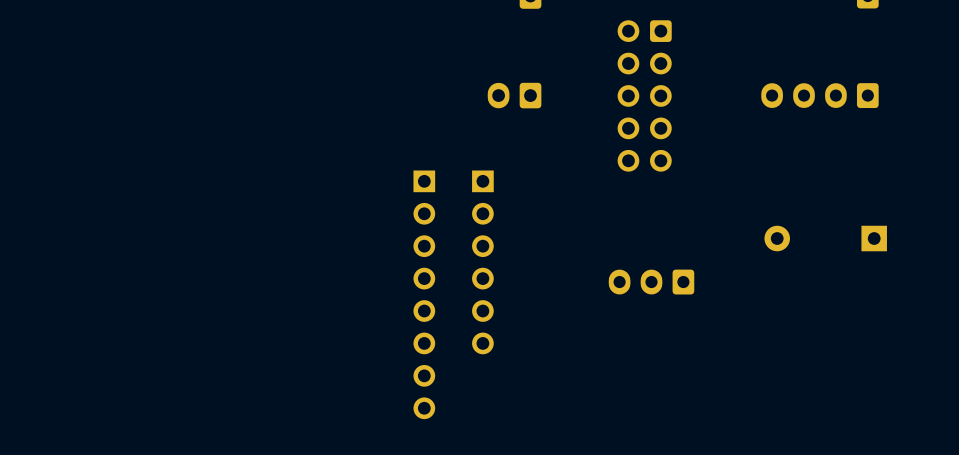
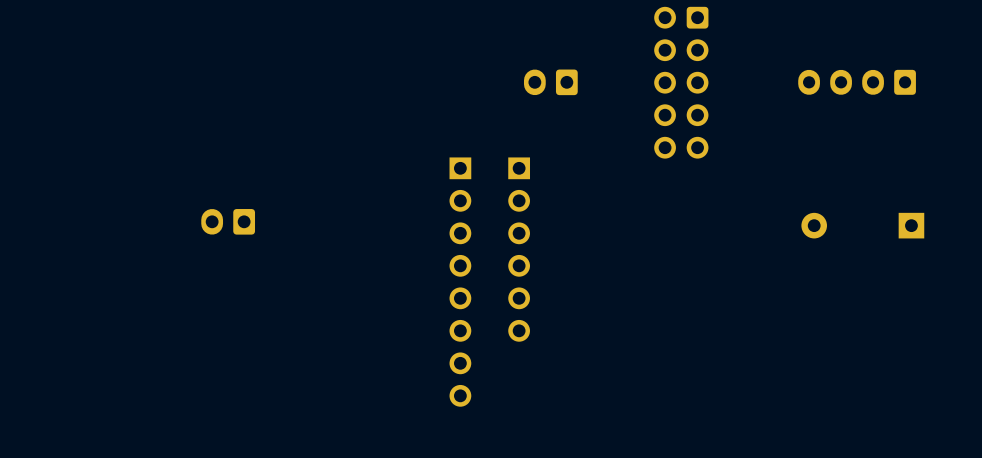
part: none -> (228, 221)
part: (651, 282) -> none

